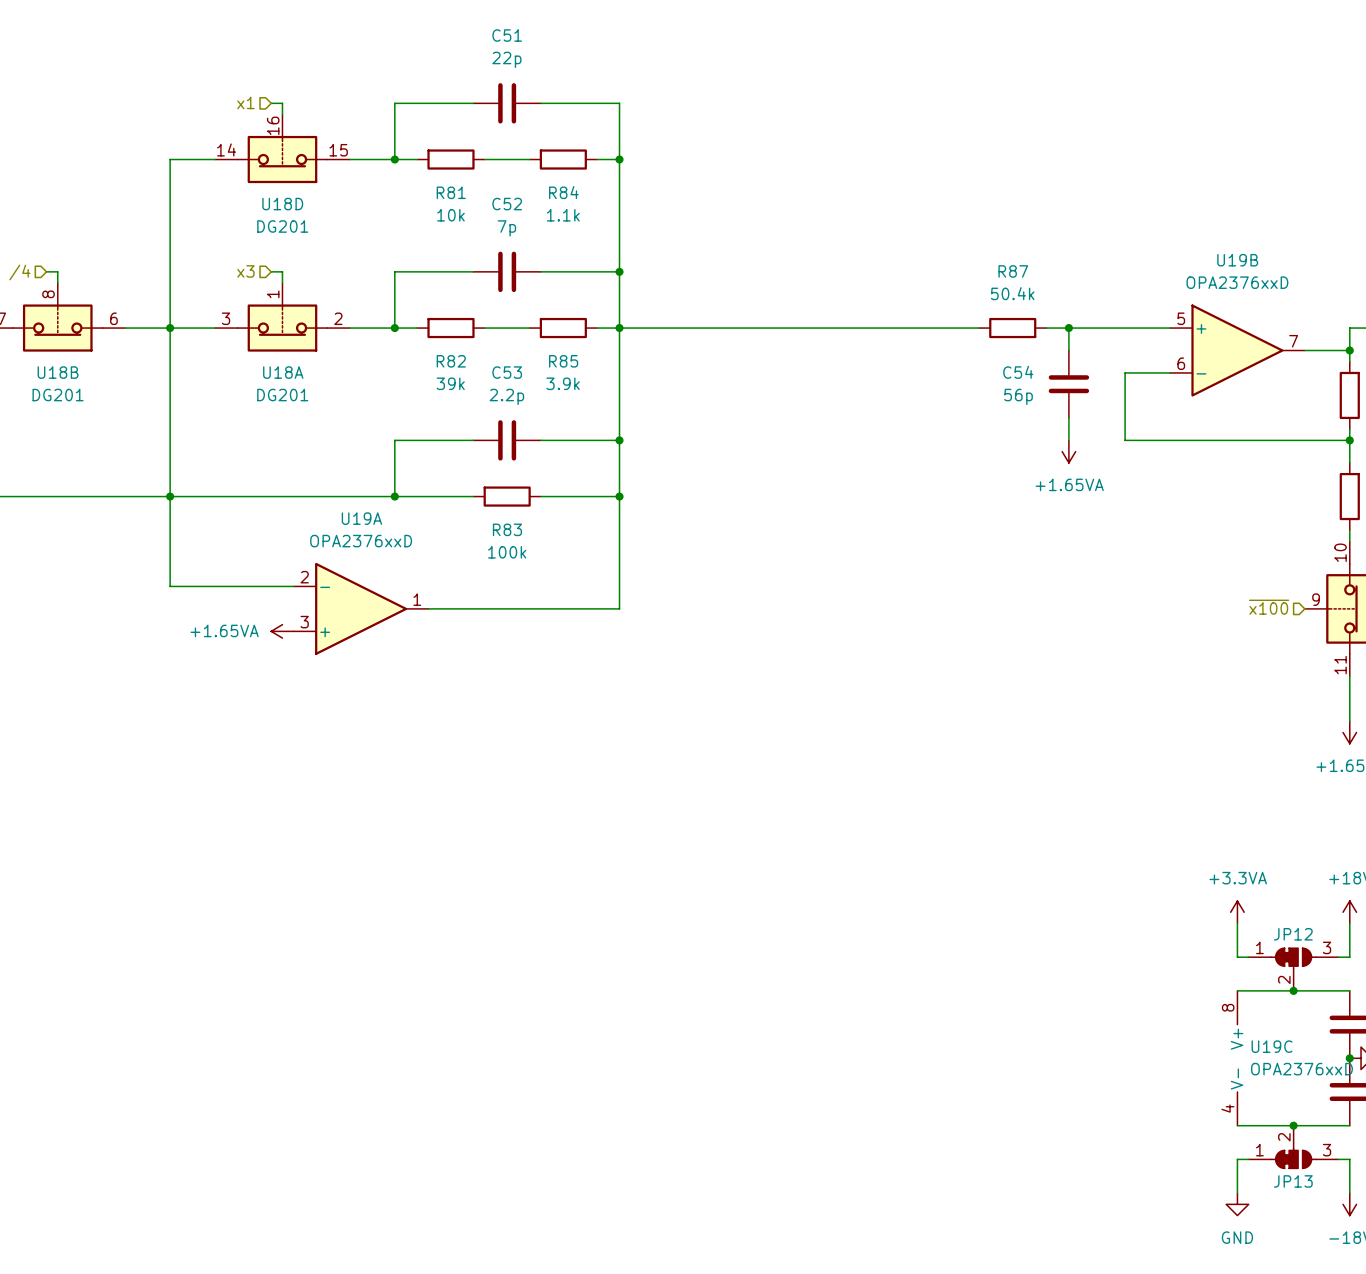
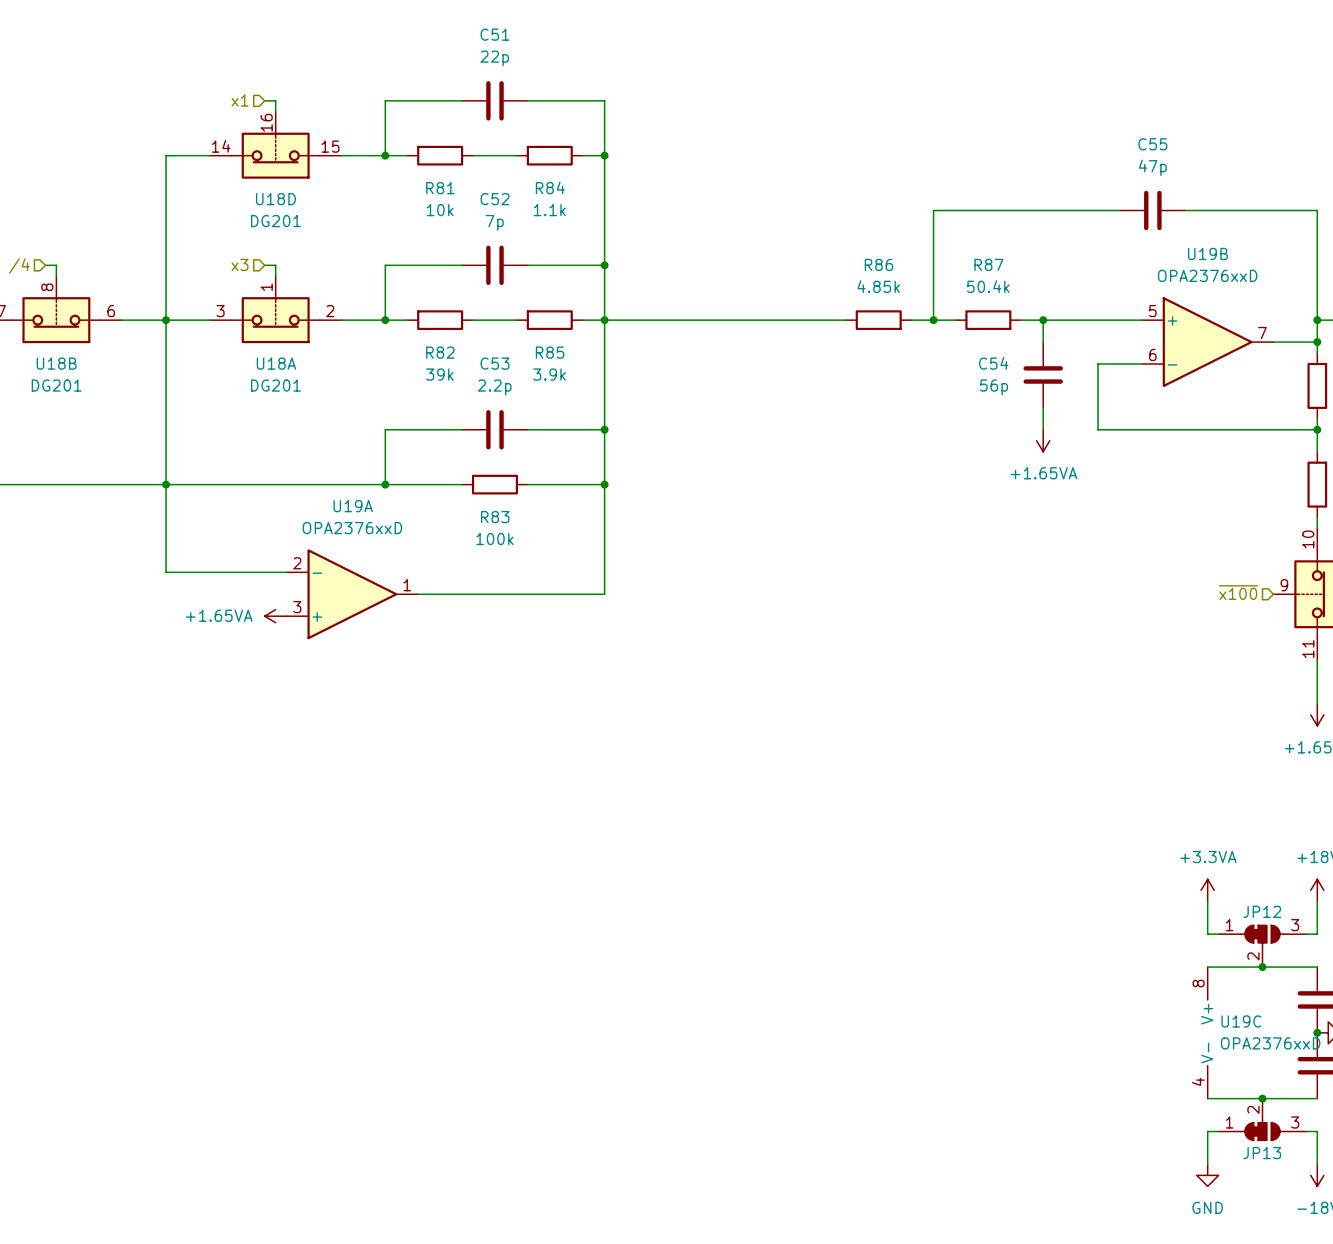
wire: none -> (1119, 210) (933, 210) (933, 320)
C55: none -> 47p (1152, 210)
wire: none -> (1185, 210) (1317, 210) (1317, 320)
wire: (866, 328) (934, 328) -> none
R86: none -> 4.85k (878, 320)
junction: none -> (933, 320)
junction: none -> (1317, 320)

